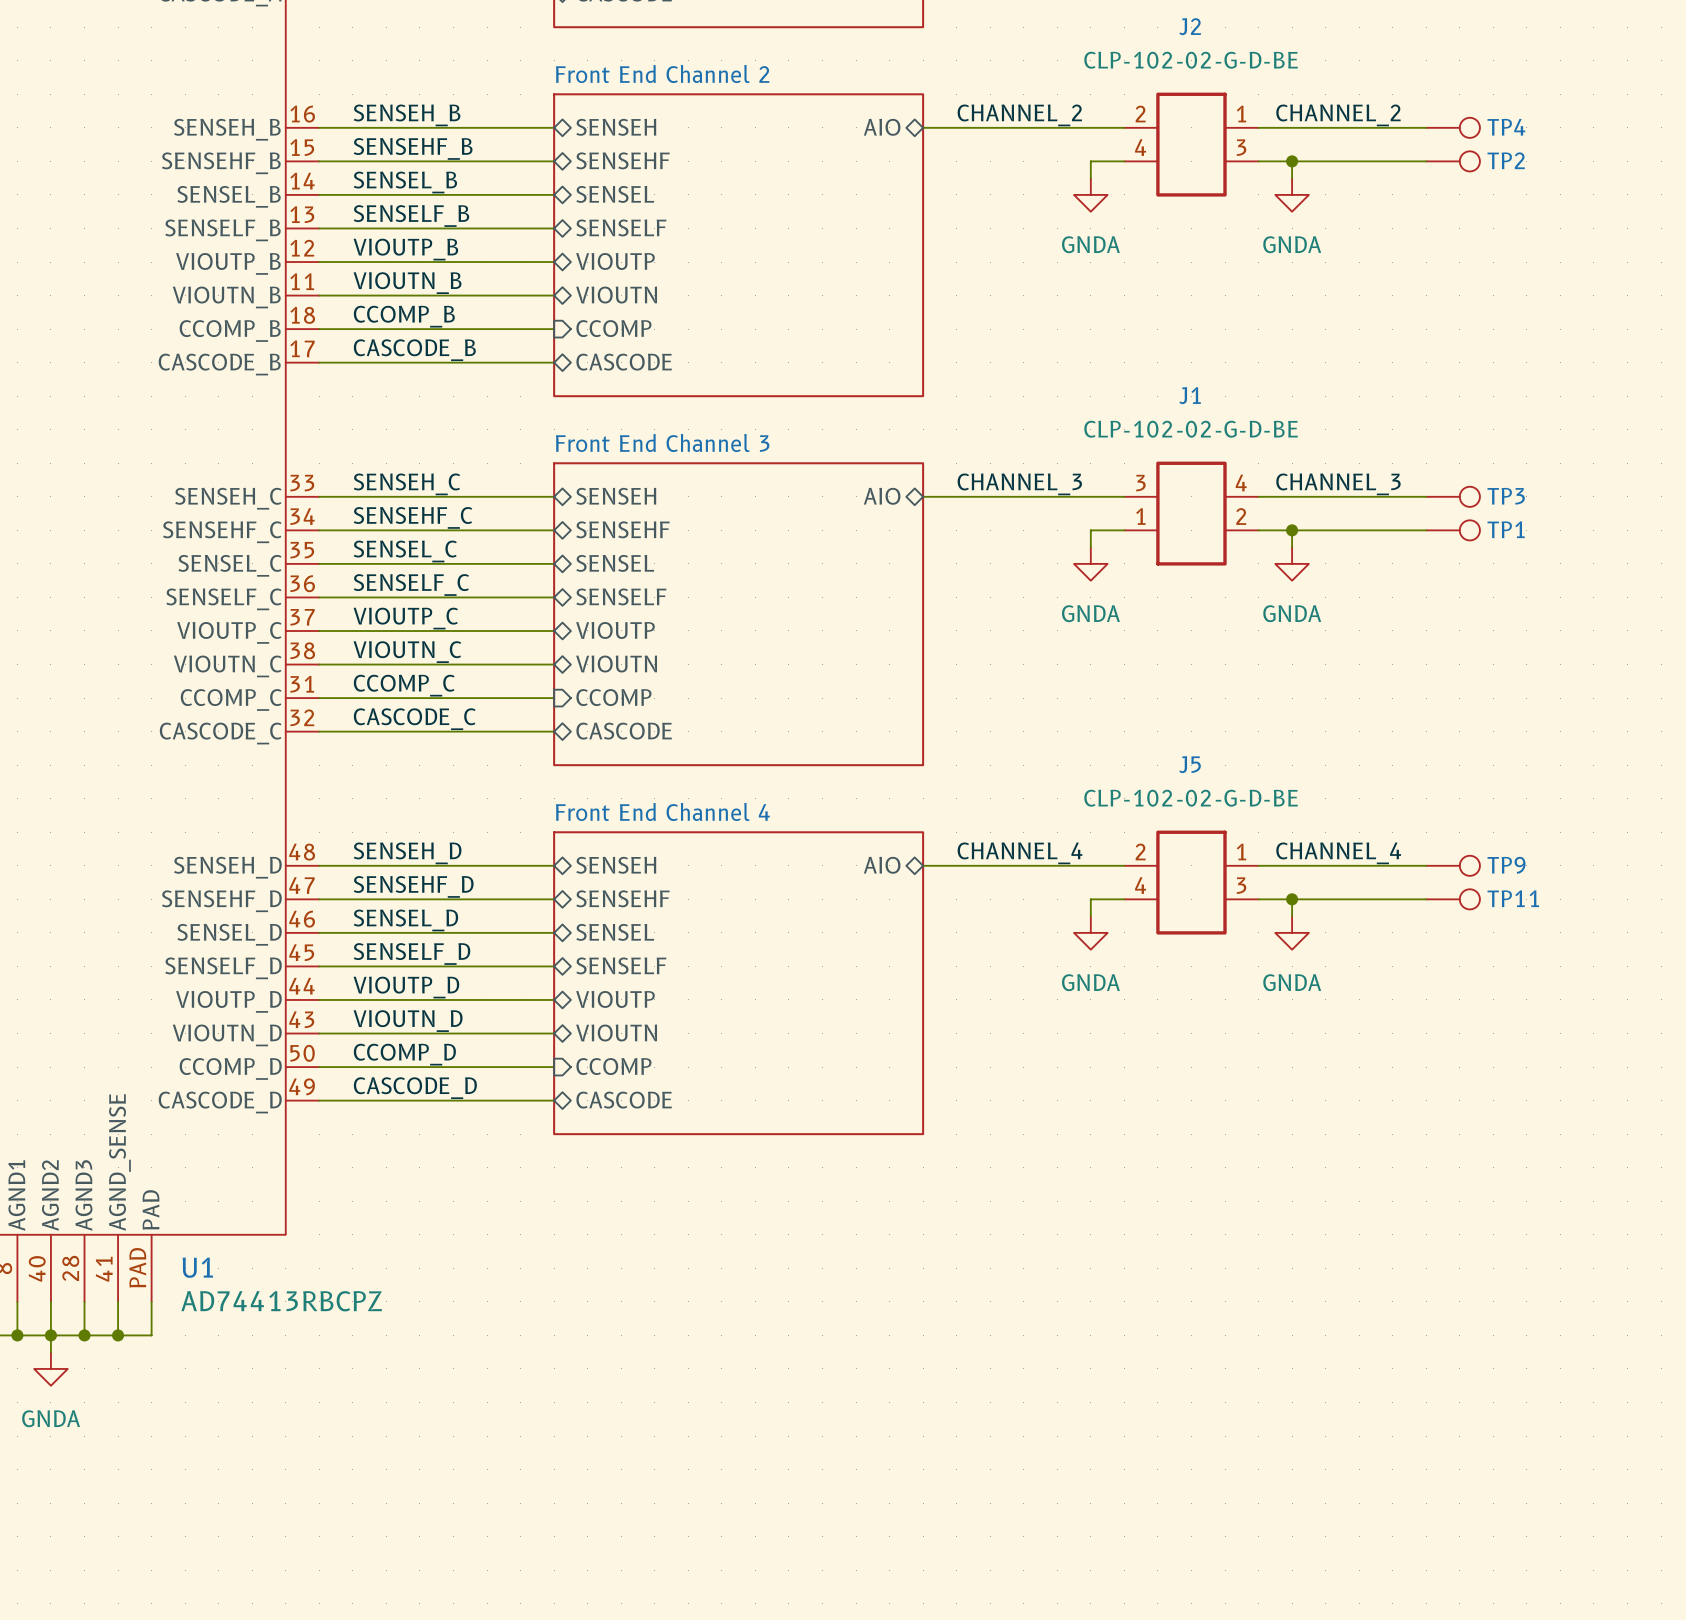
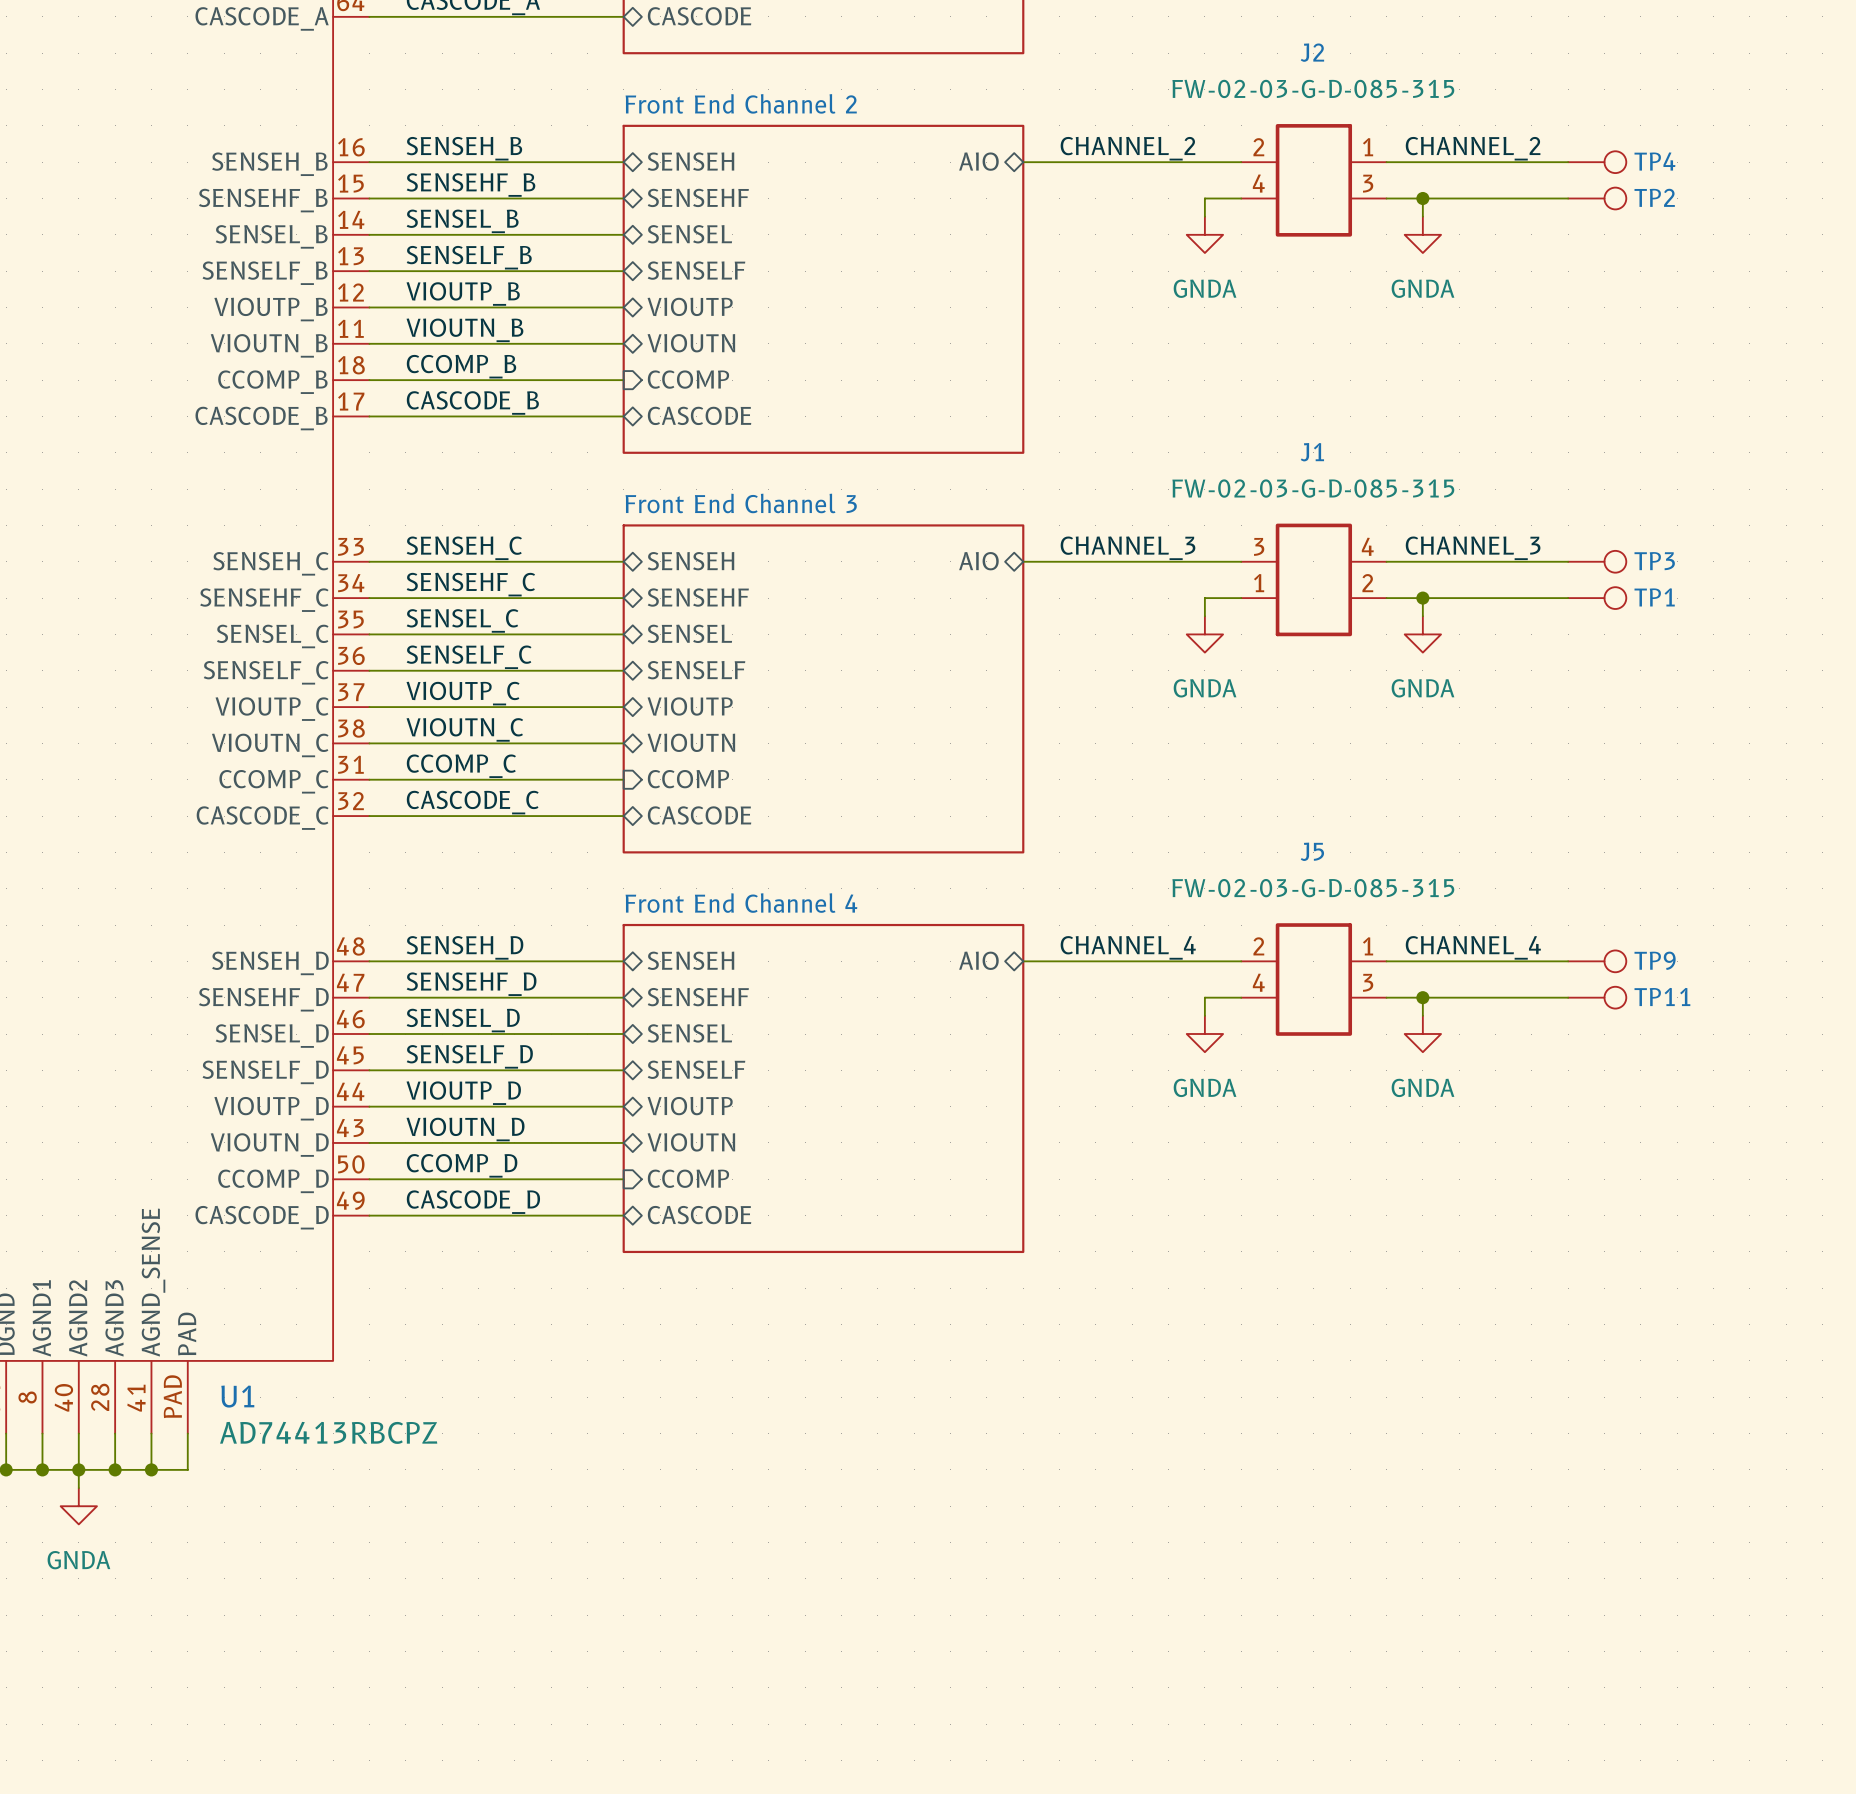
J2 value: CLP-102-02-G-D-BE (1191, 60) -> FW-02-03-G-D-085-315 (1313, 88)
J1 value: CLP-102-02-G-D-BE (1191, 429) -> FW-02-03-G-D-085-315 (1313, 488)
J5 value: CLP-102-02-G-D-BE (1191, 798) -> FW-02-03-G-D-085-315 (1313, 888)

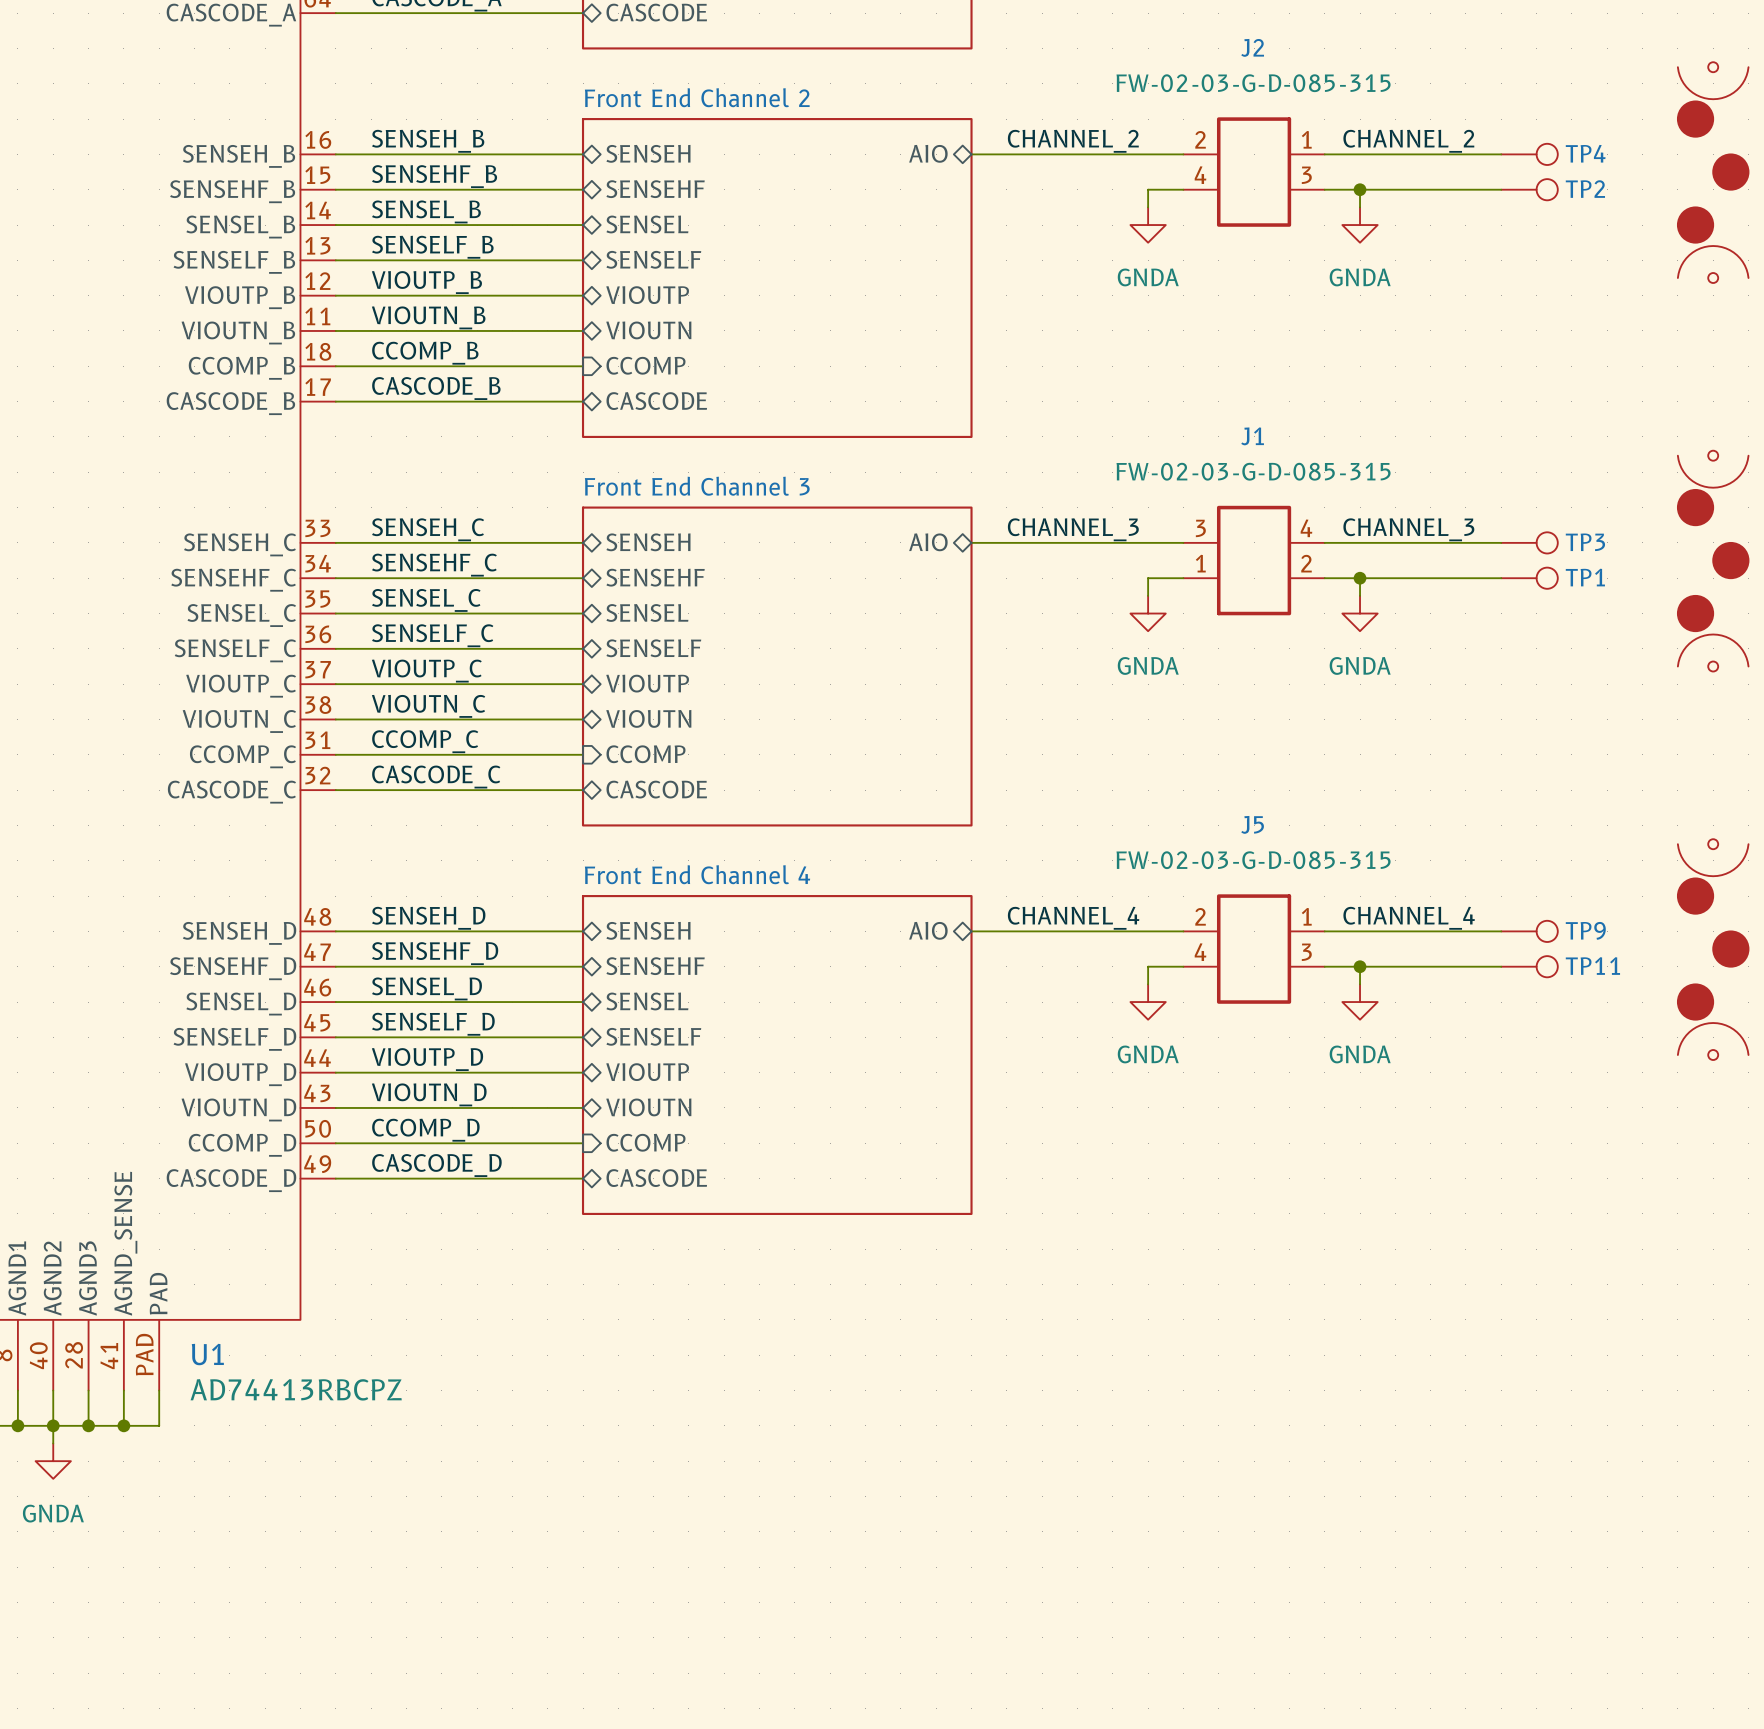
part: none -> (1713, 172)
part: none -> (1713, 561)
part: none -> (1713, 949)

